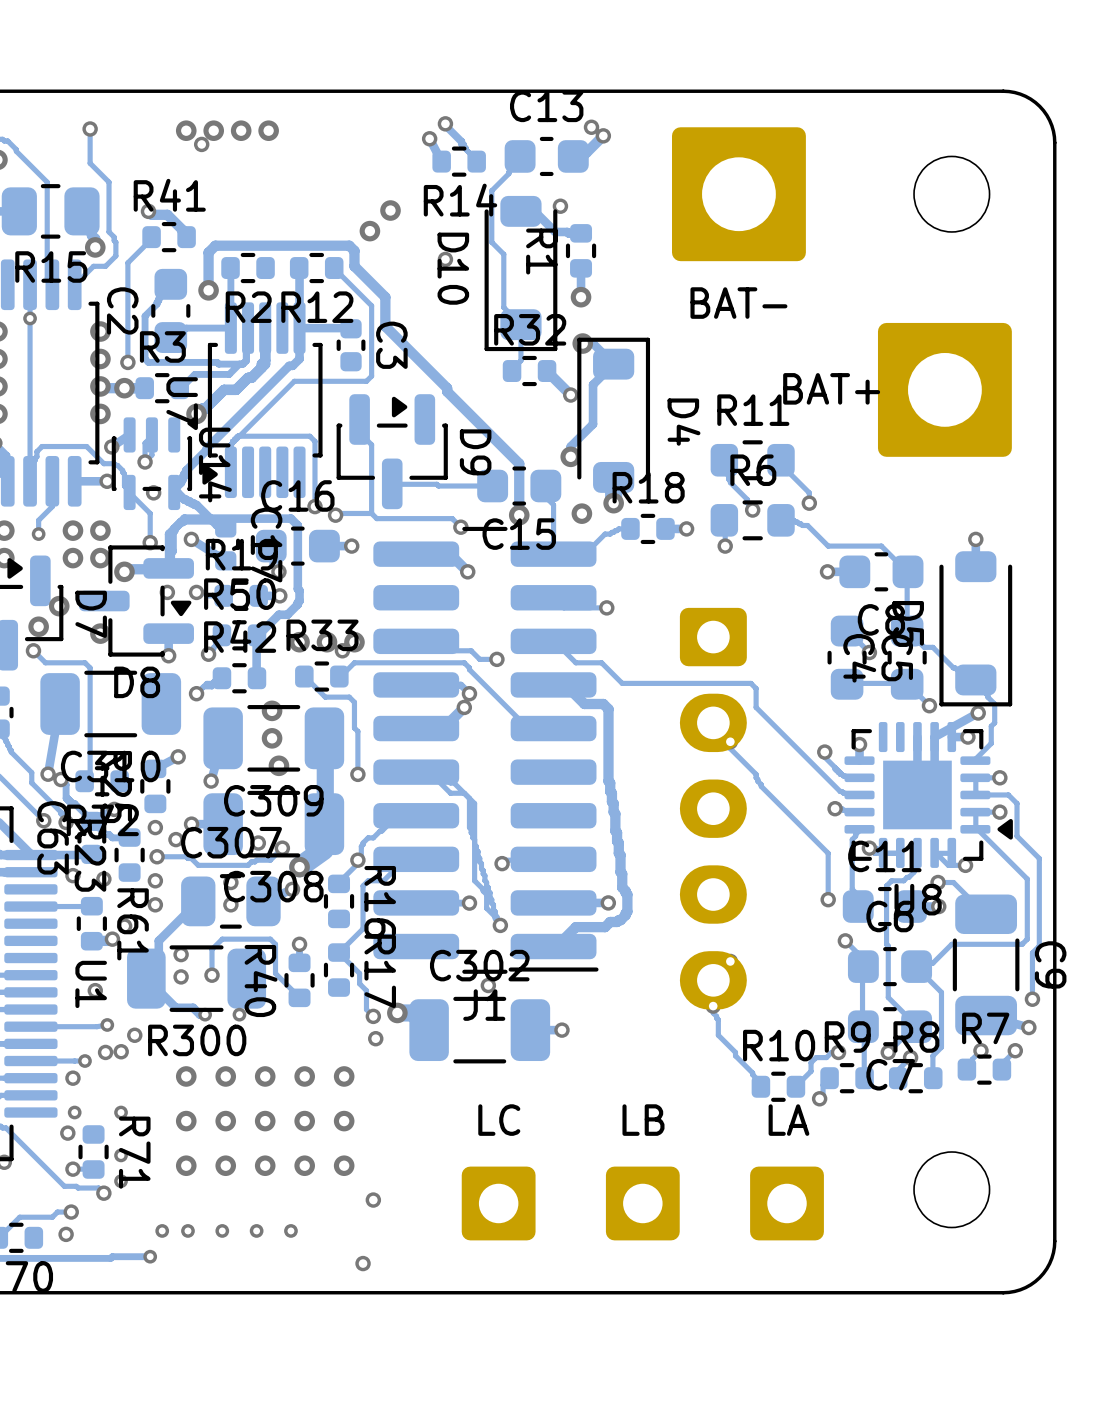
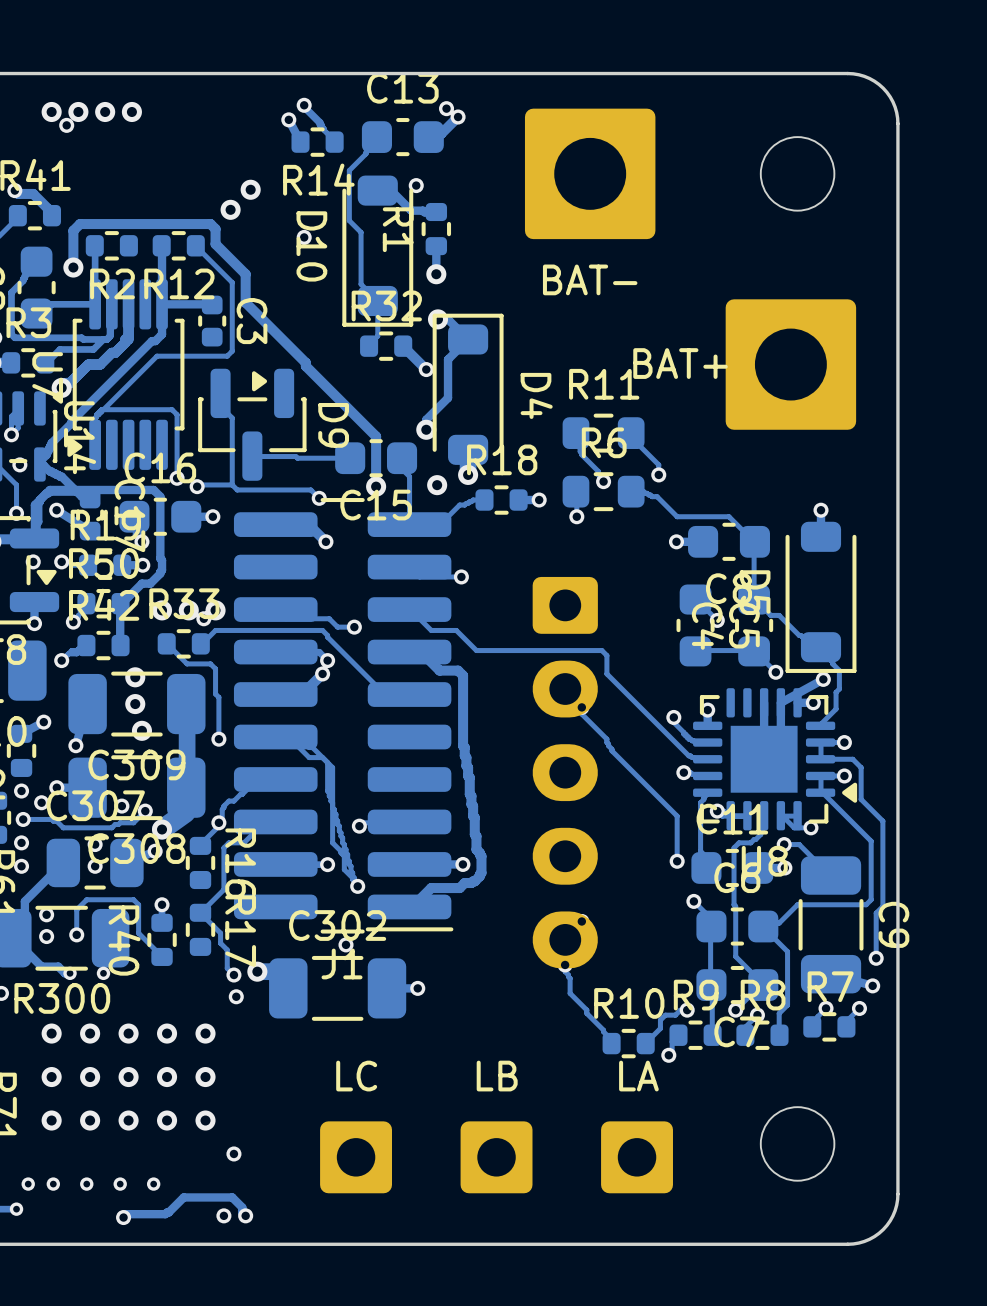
track: none -> (245, 1215) (242, 1212) (242, 1207) (232, 1197) (183, 1197) (165, 1214) (126, 1214) (123, 1217)
via: none -> (245, 1215)
via: none -> (123, 1217)

